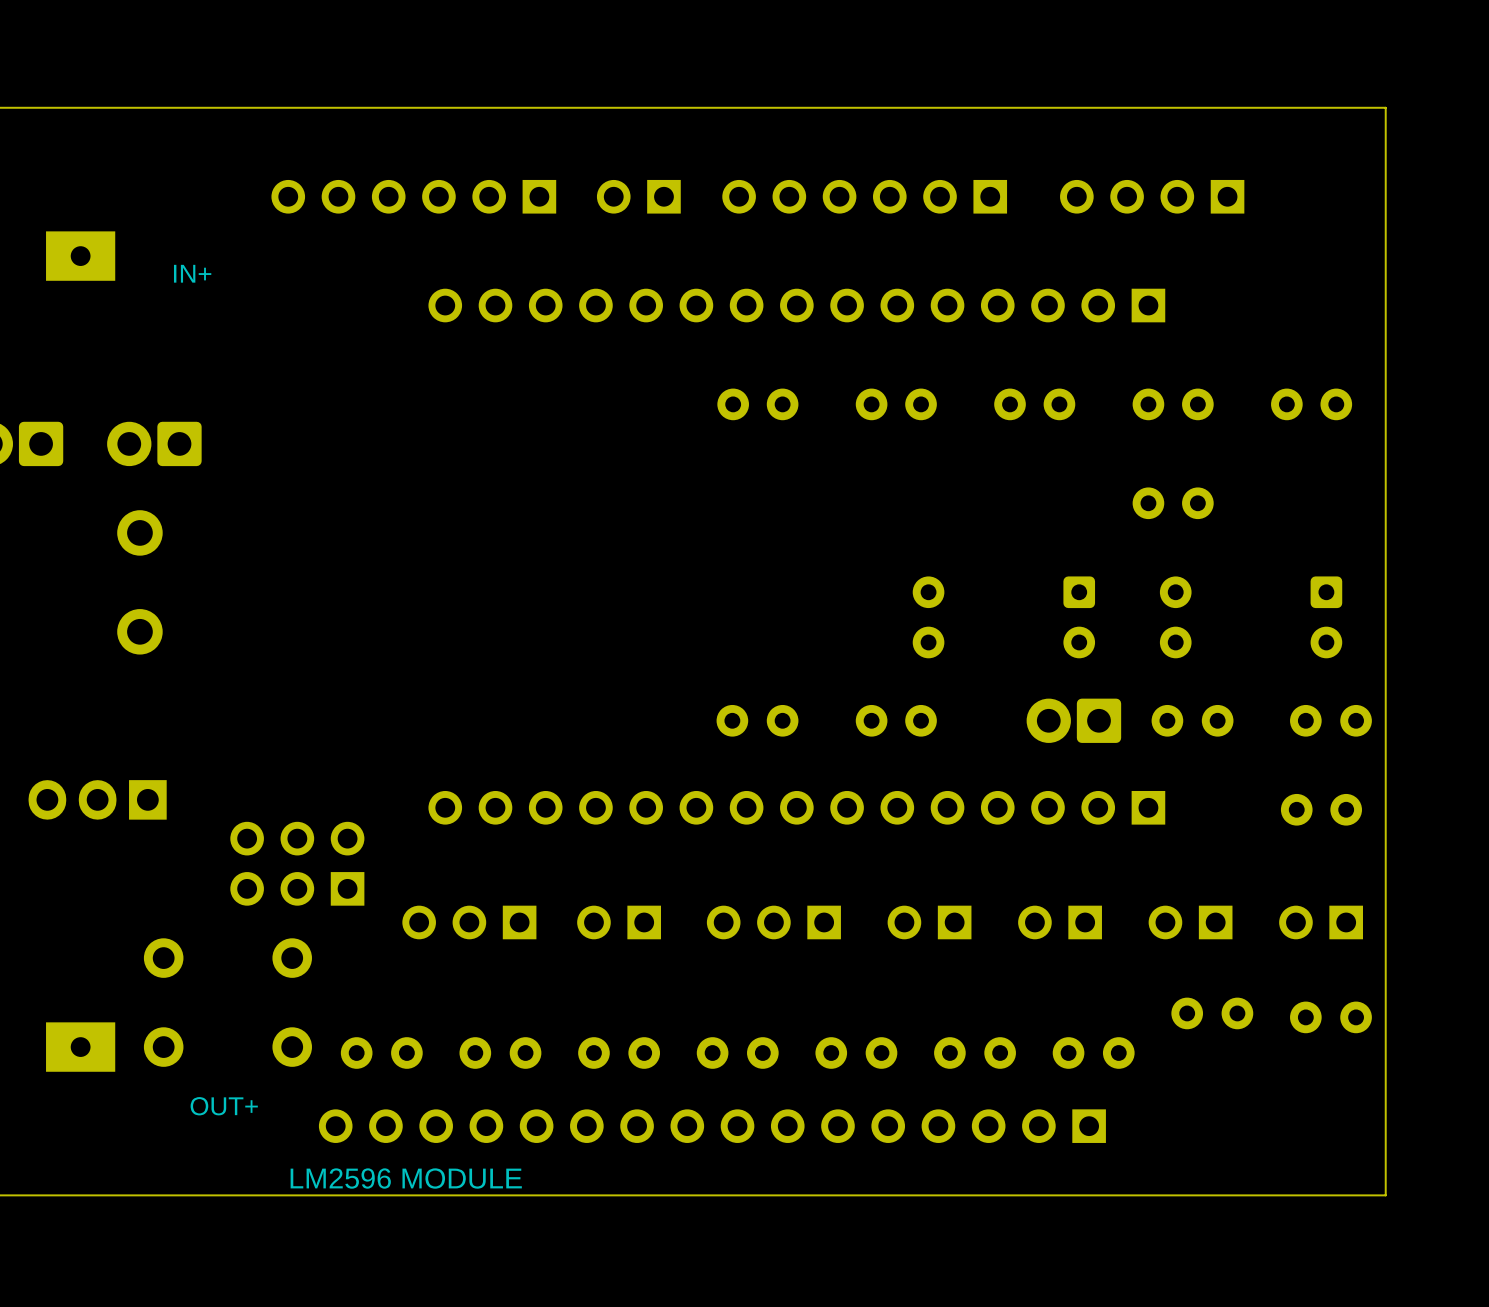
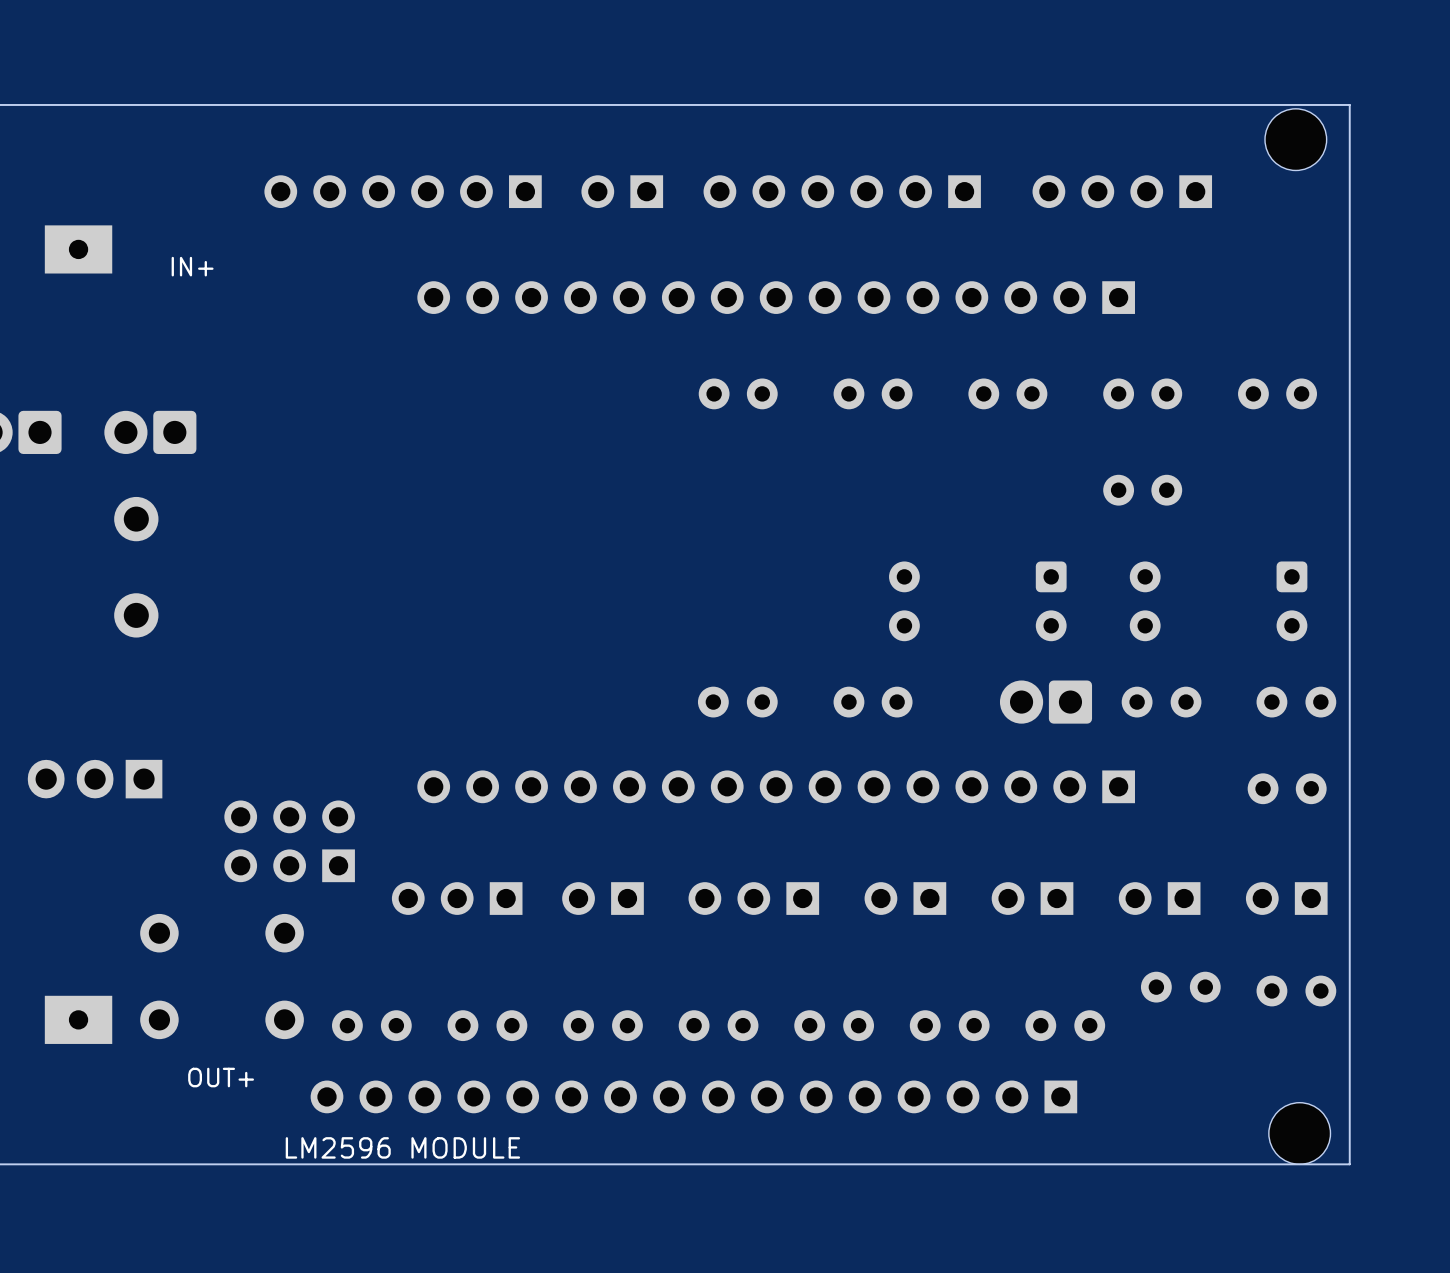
part: none -> (1295, 139)
part: none -> (1299, 1133)

